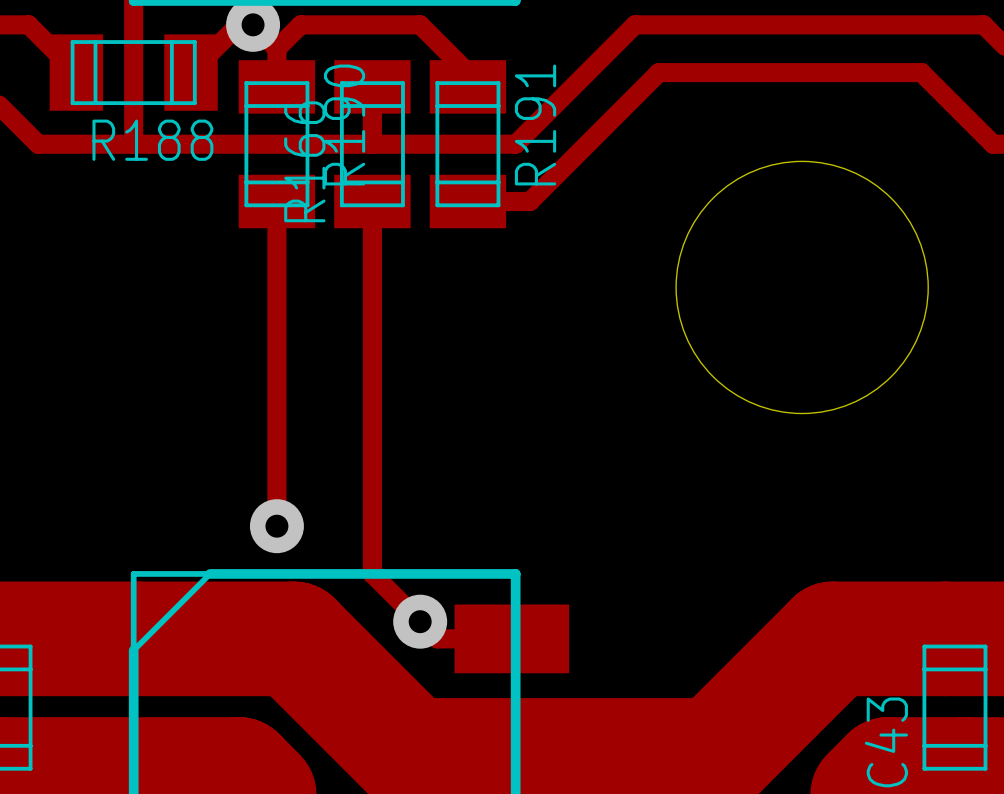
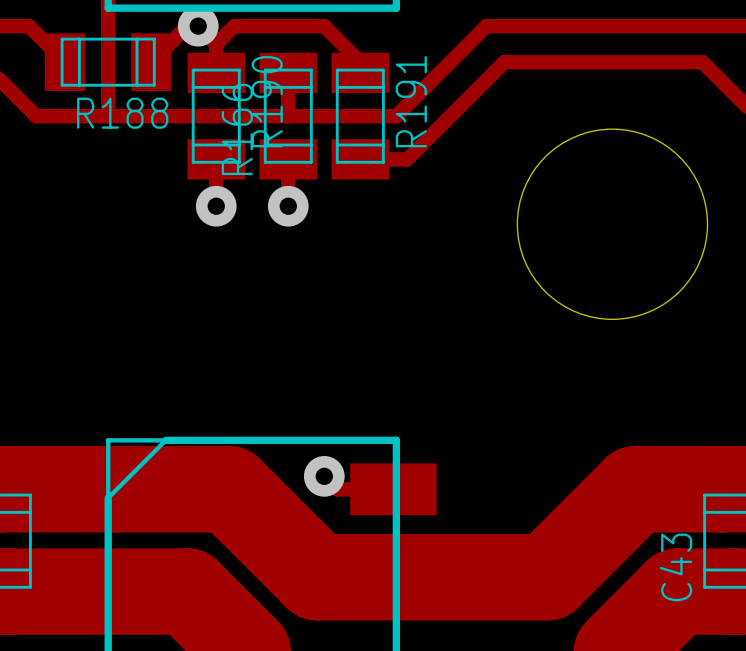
track: (276, 263) (276, 526) -> none
via: none -> (216, 206)
track: (372, 263) (372, 573) (420, 621) -> none
via: none -> (288, 206)
via: (276, 526) -> none

